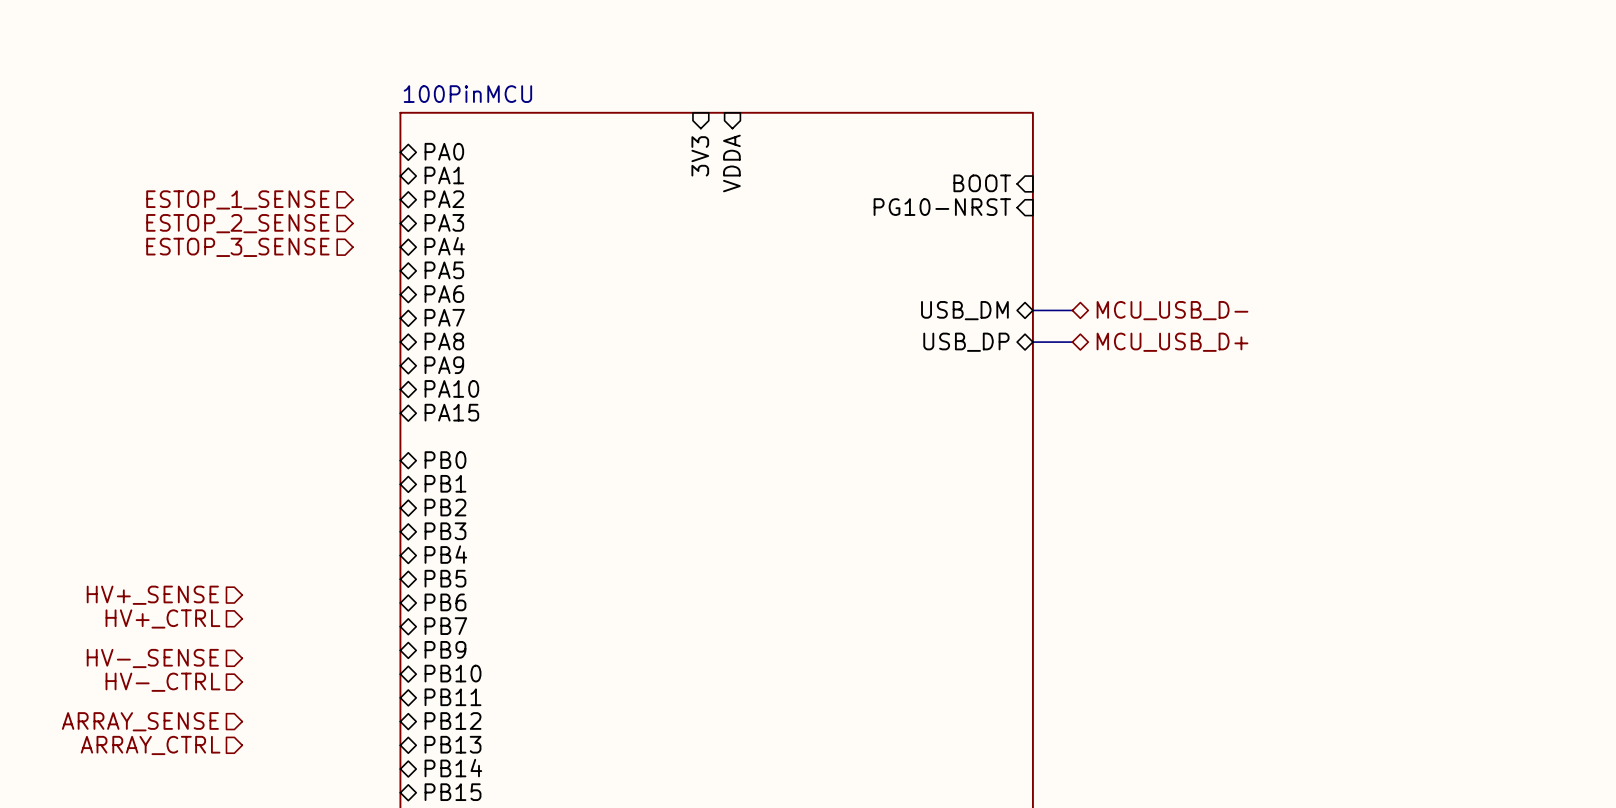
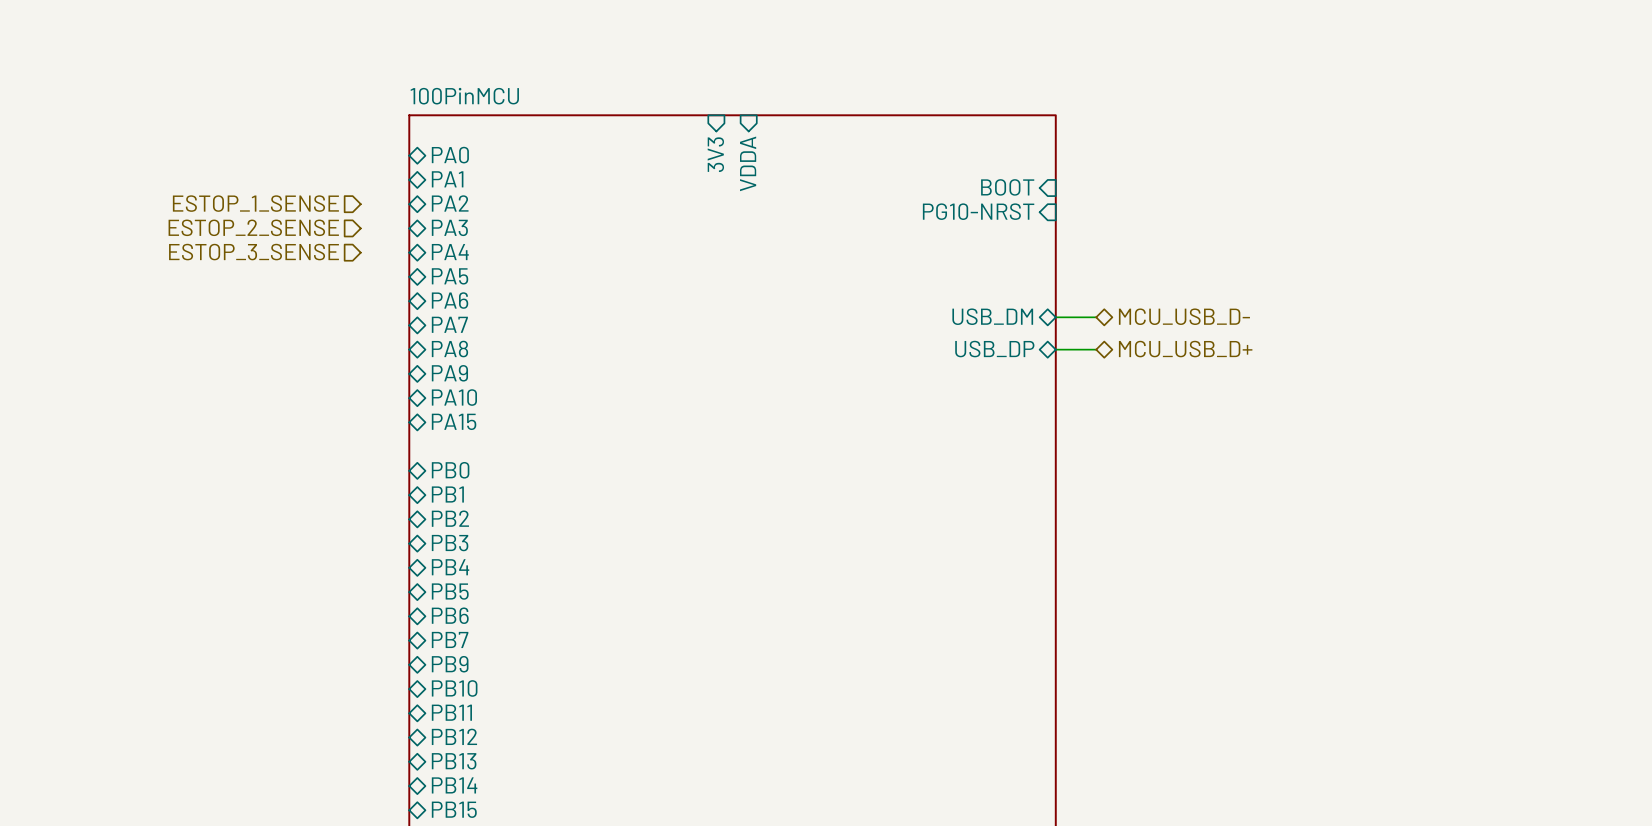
hierarchical label: HV+_SENSE (152, 595) -> none
hierarchical label: HV+_CTRL (162, 618) -> none
hierarchical label: HV-_SENSE (152, 658) -> none
hierarchical label: HV-_CTRL (162, 682) -> none
hierarchical label: ARRAY_SENSE (140, 721) -> none
hierarchical label: ARRAY_CTRL (150, 745) -> none

